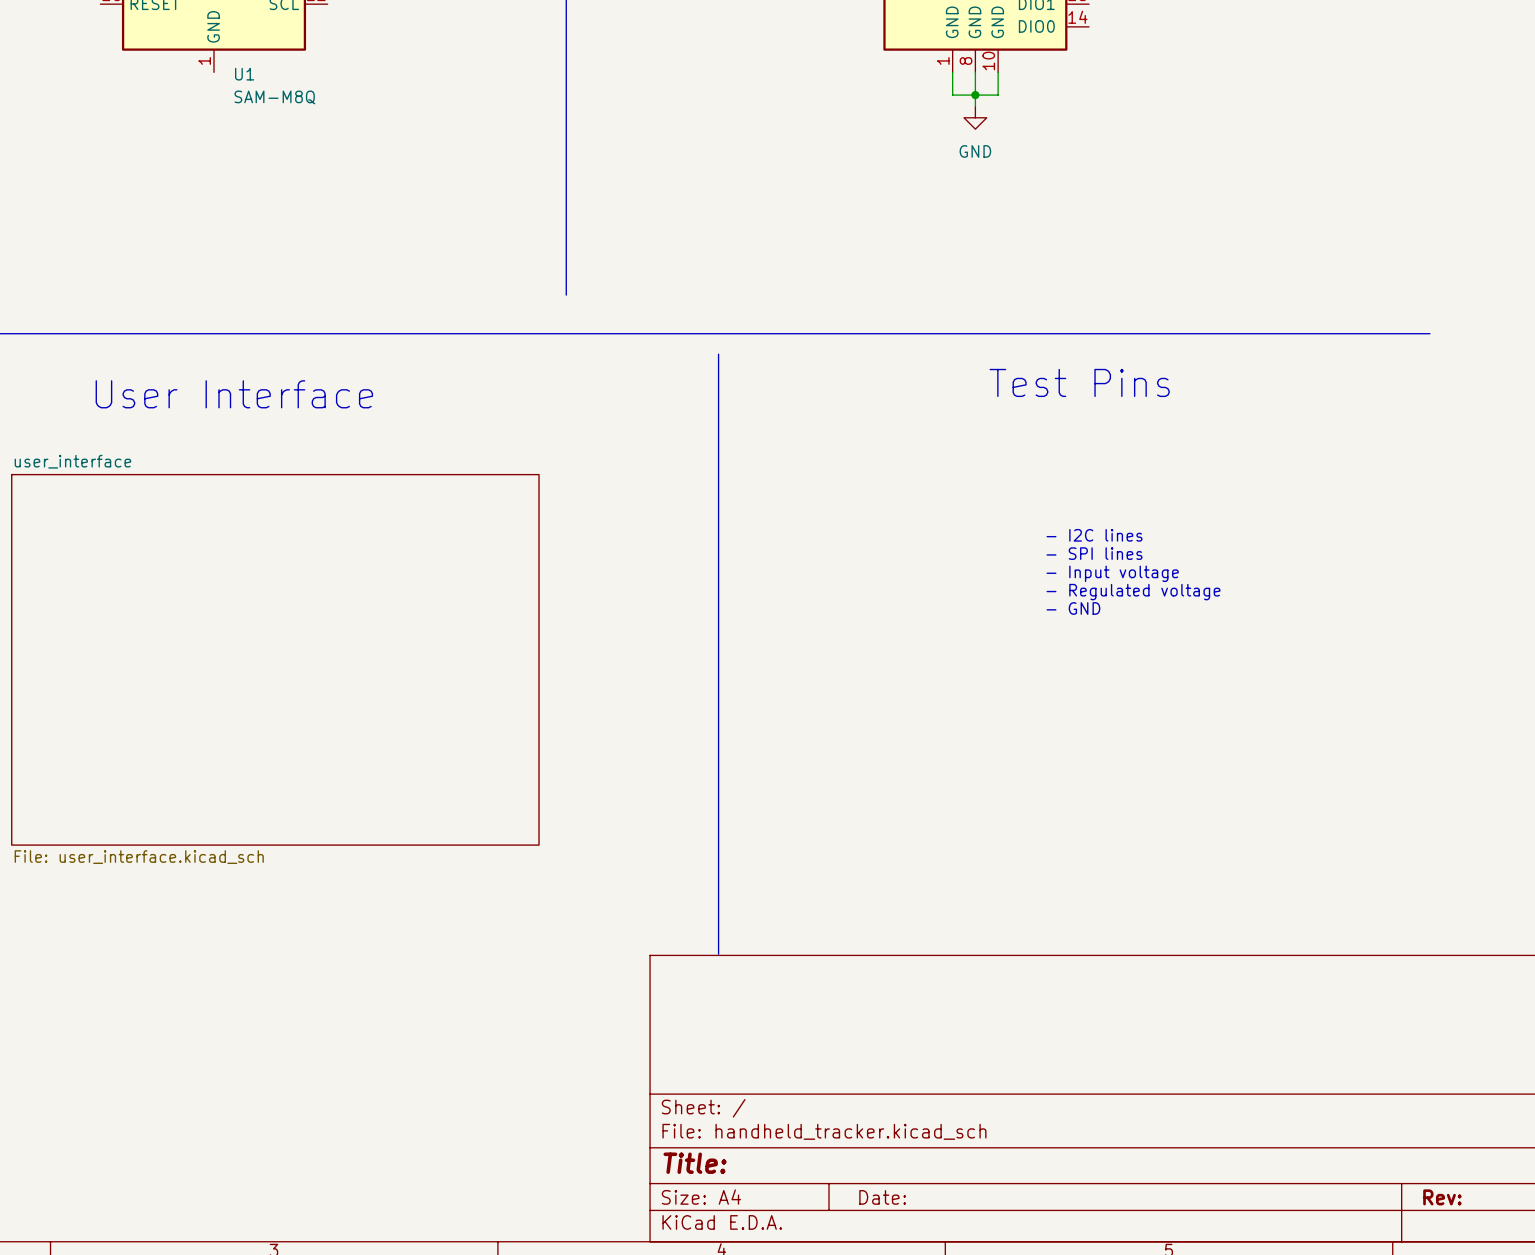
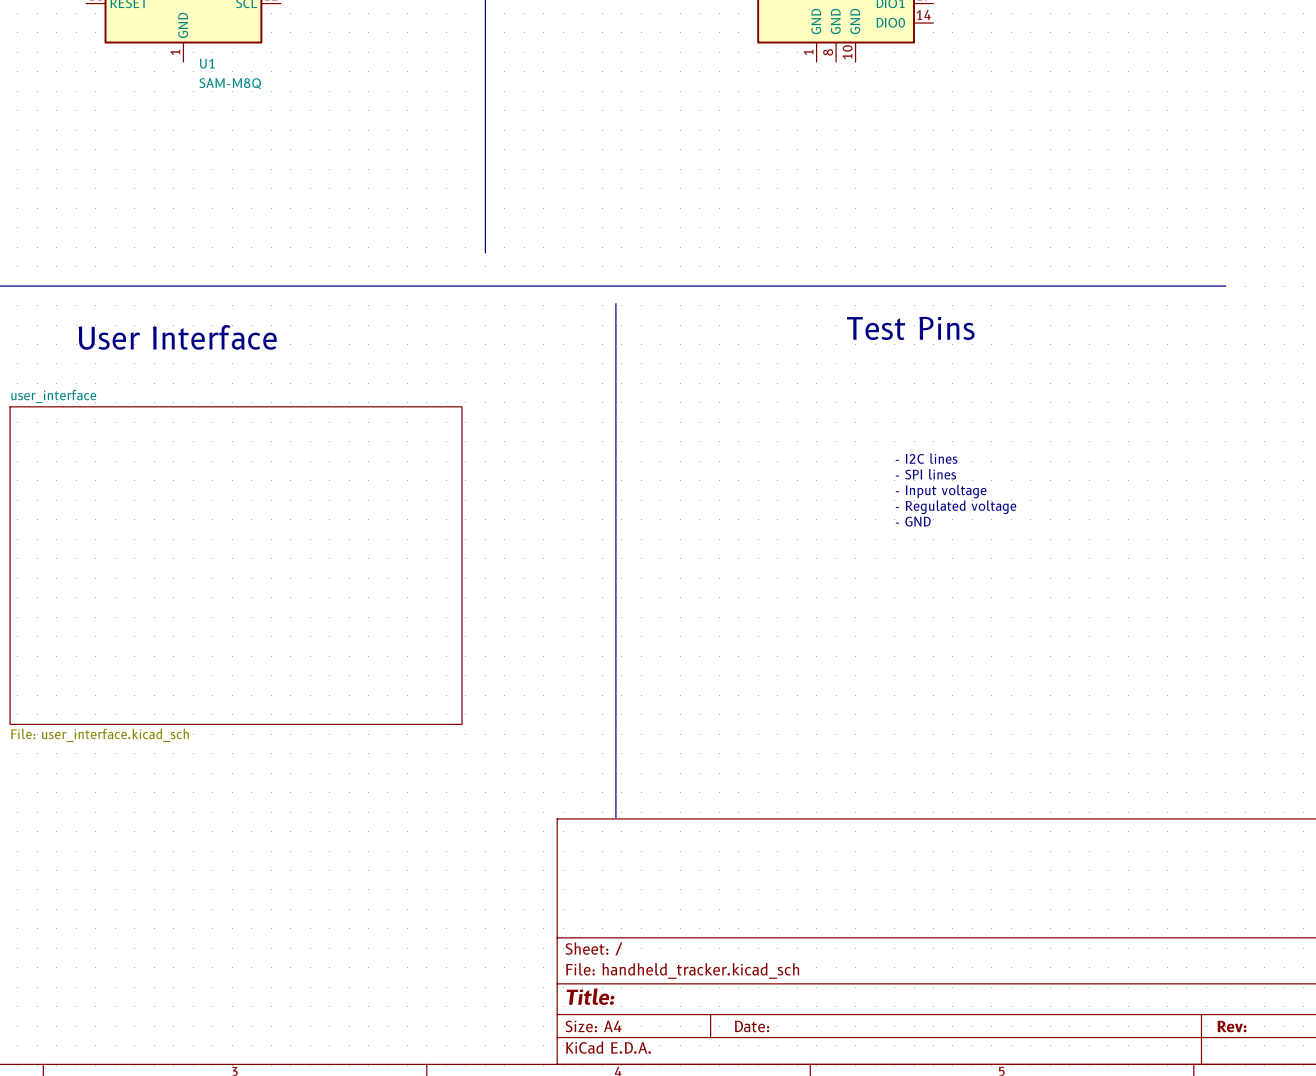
wire: (952, 72) (952, 95) (998, 95) (998, 72) -> none
wire: (975, 72) (975, 106) -> none
junction: (975, 95) -> none
power symbol: GND (975, 117) -> none

